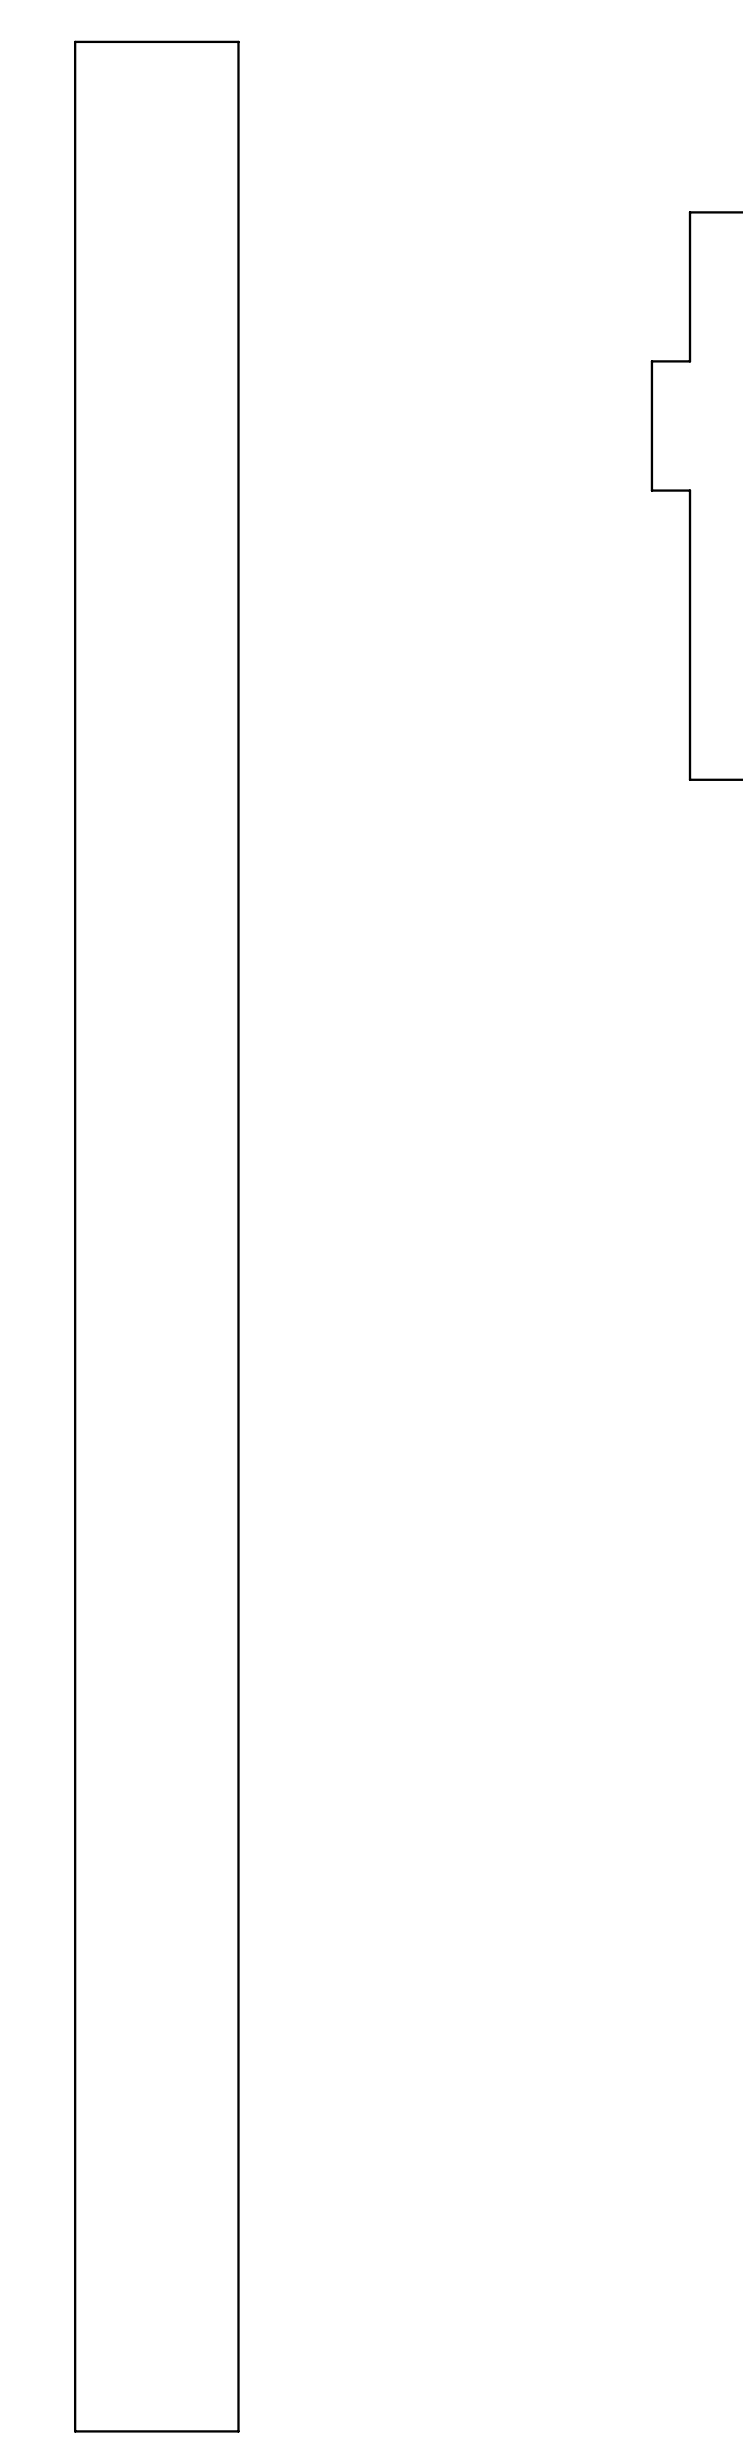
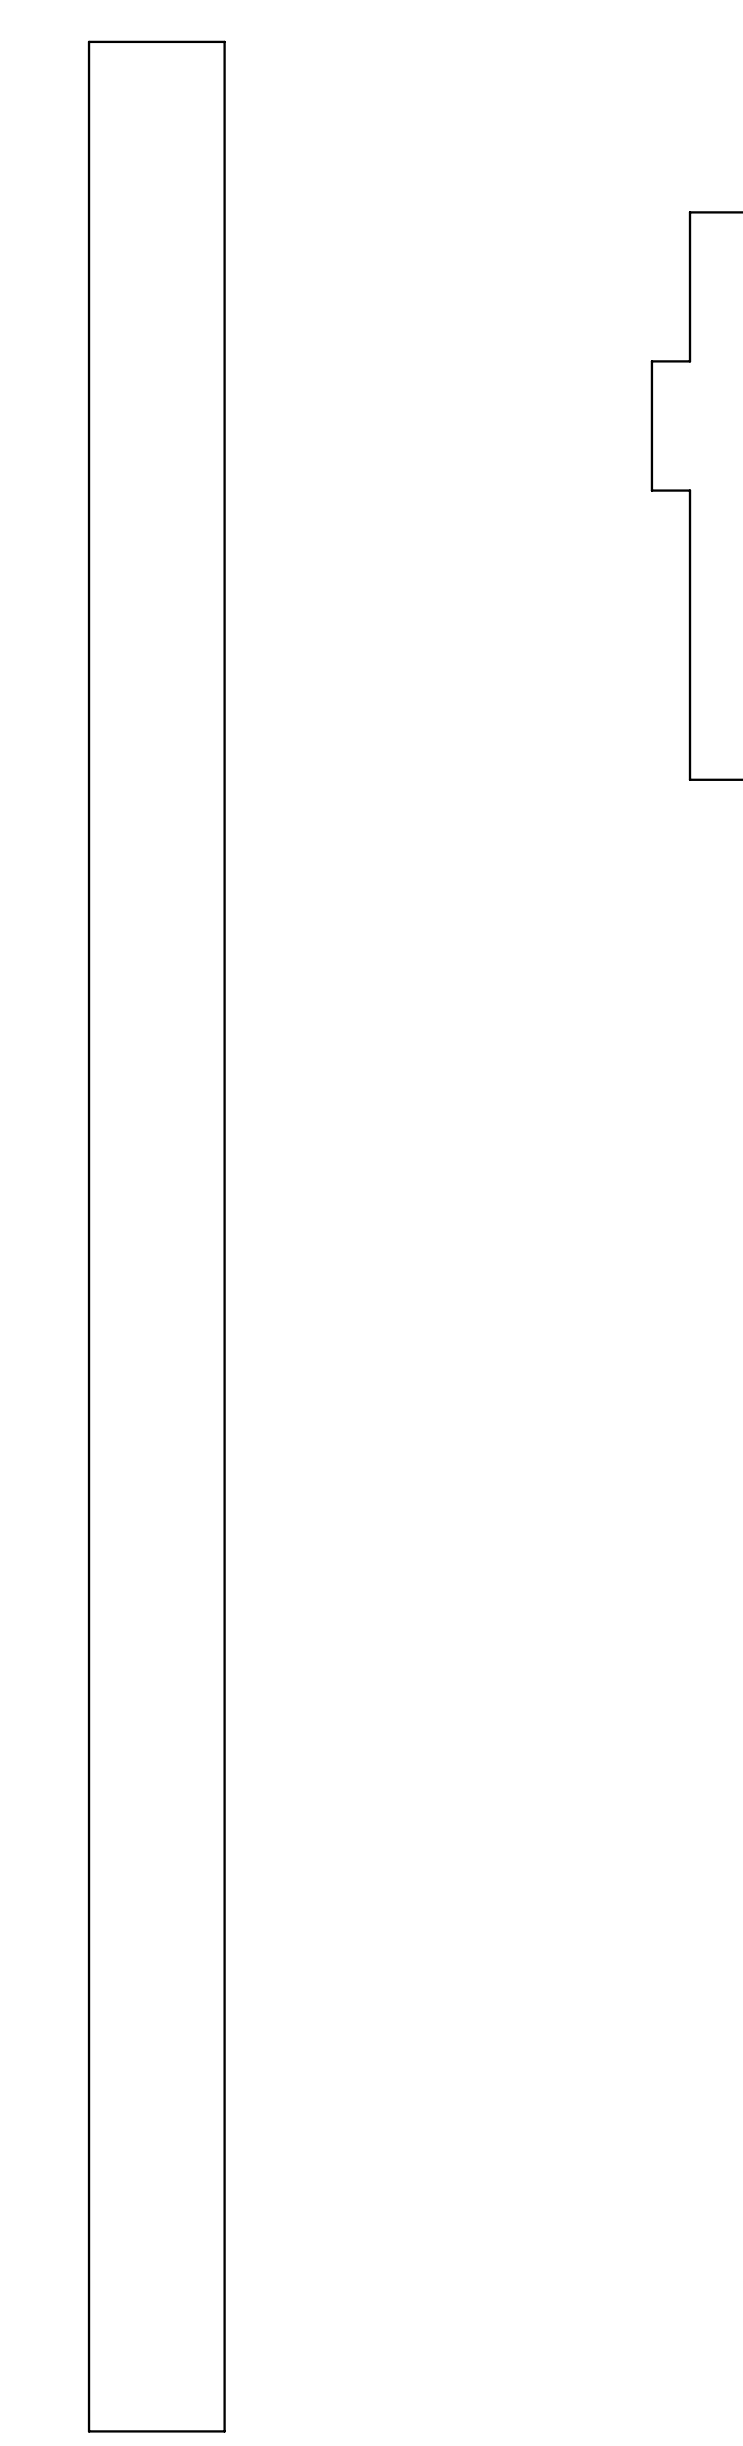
board edge: (89, 41) (75, 41) (75, 2431) (89, 2431) -> (89, 41) (89, 2431)
board edge: (224, 41) (238, 41) (238, 2431) (224, 2431) -> (224, 41) (224, 2431)

